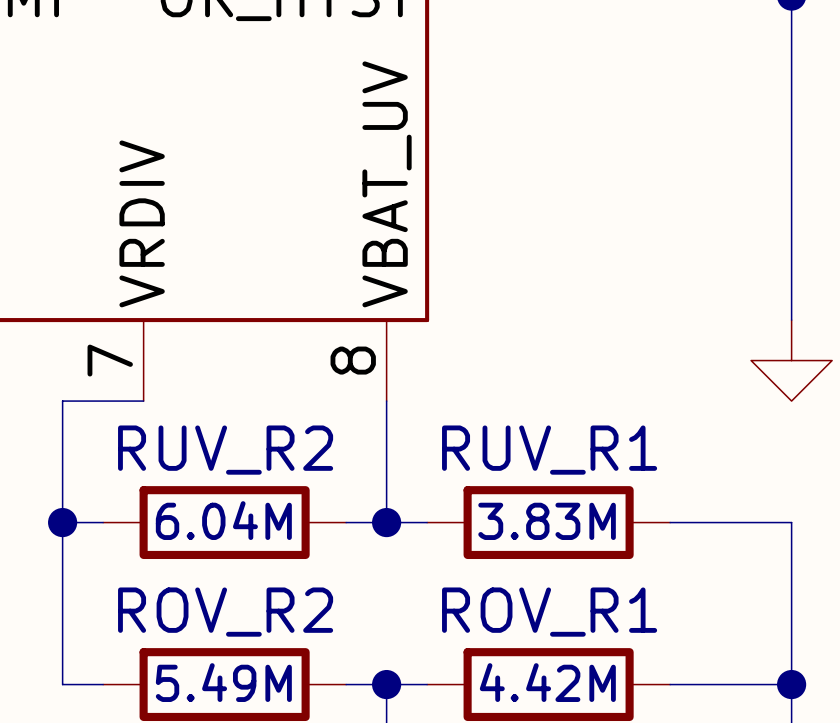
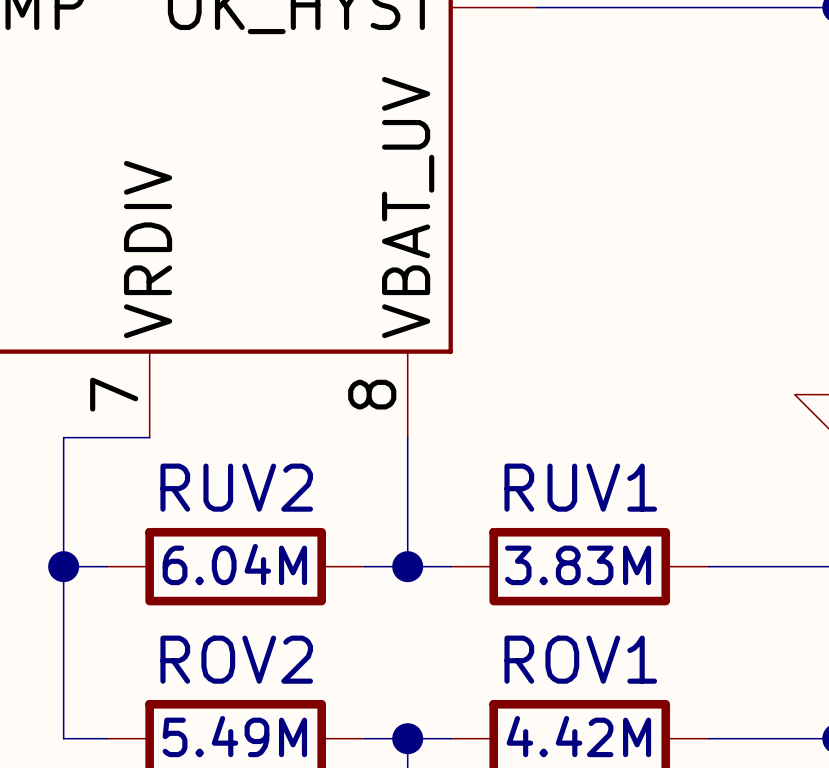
RUV_R2 name: RUV_R2 (225, 450) -> RUV2 (236, 487)
RUV_R1 name: RUV_R1 (549, 450) -> RUV1 (580, 487)
ROV_R2 name: ROV_R2 (225, 612) -> ROV2 (236, 659)
ROV_R1 name: ROV_R1 (549, 612) -> ROV1 (580, 659)

